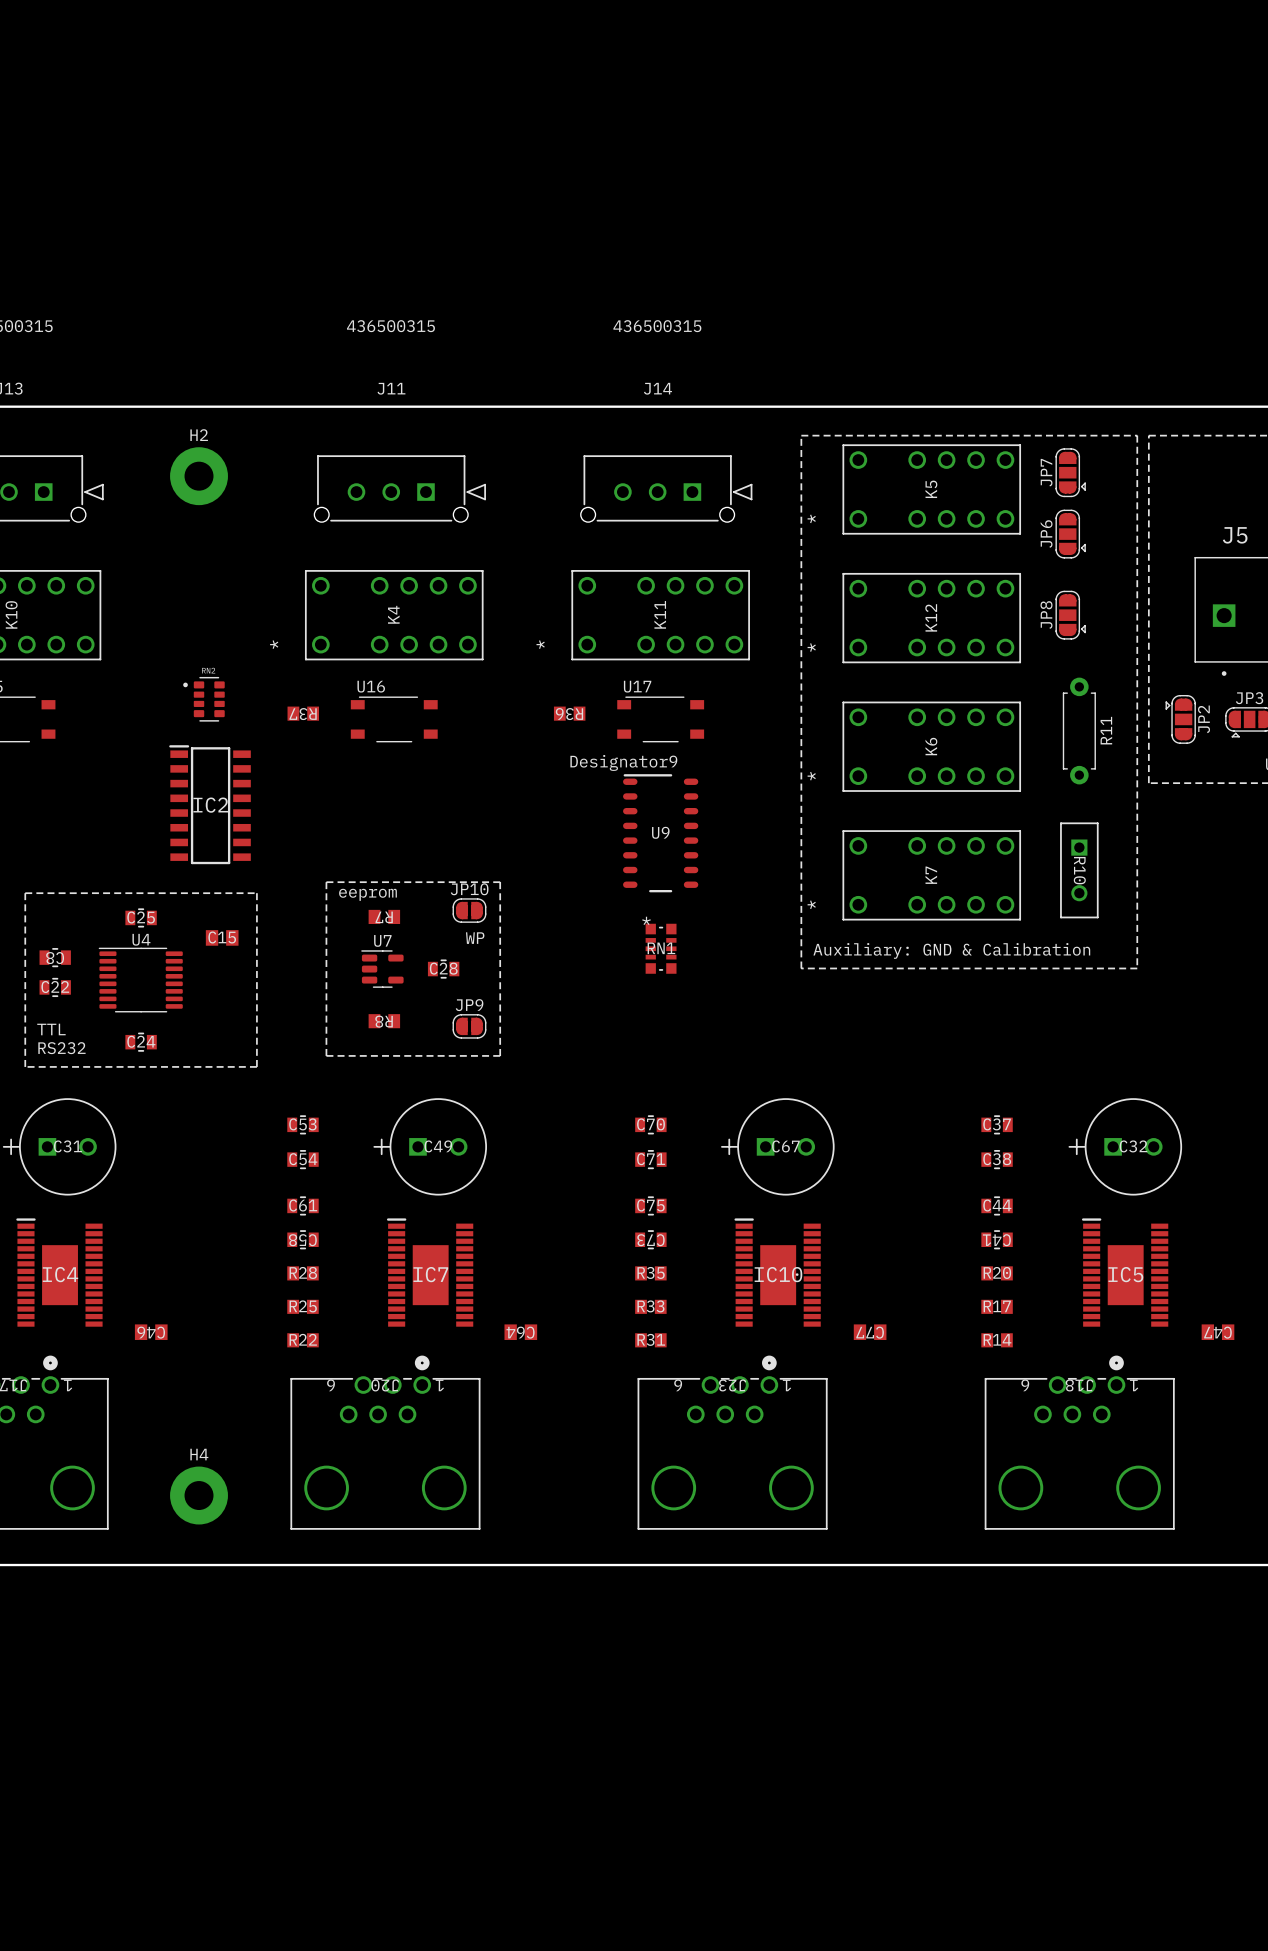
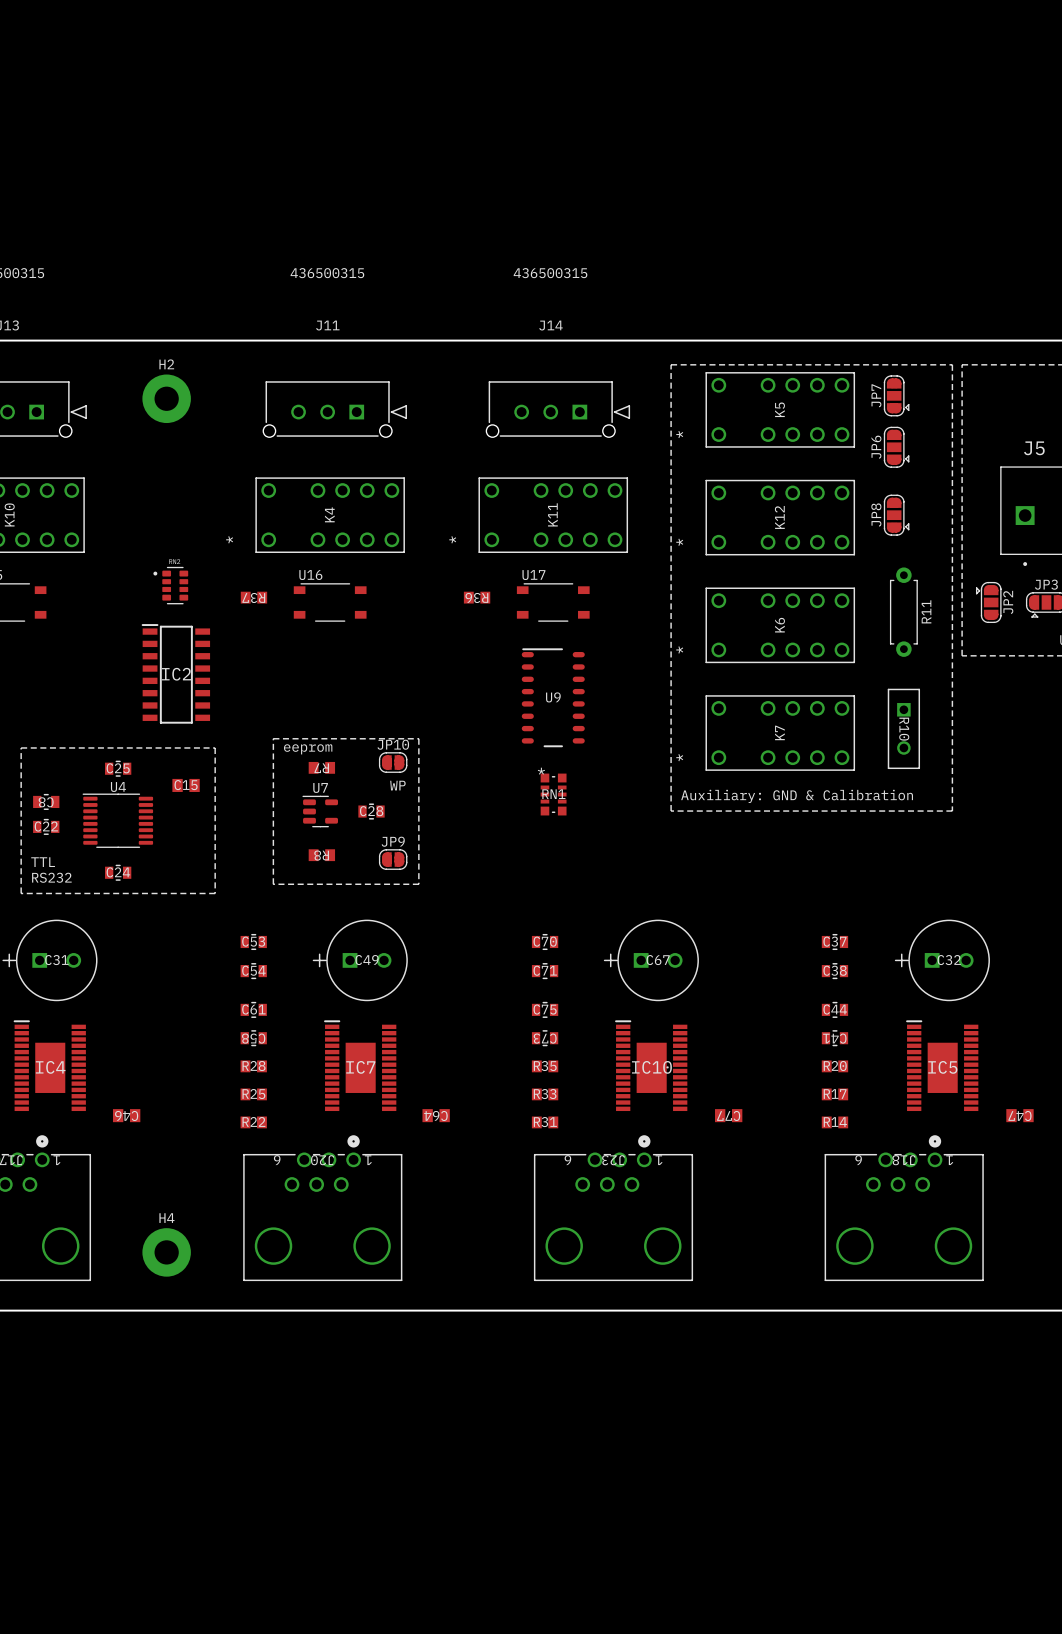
U9 text: Designator9 (623, 762) -> none

